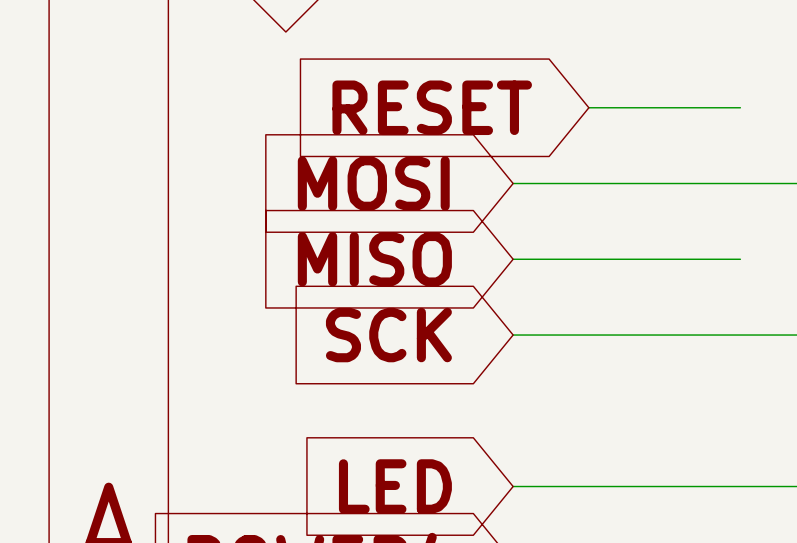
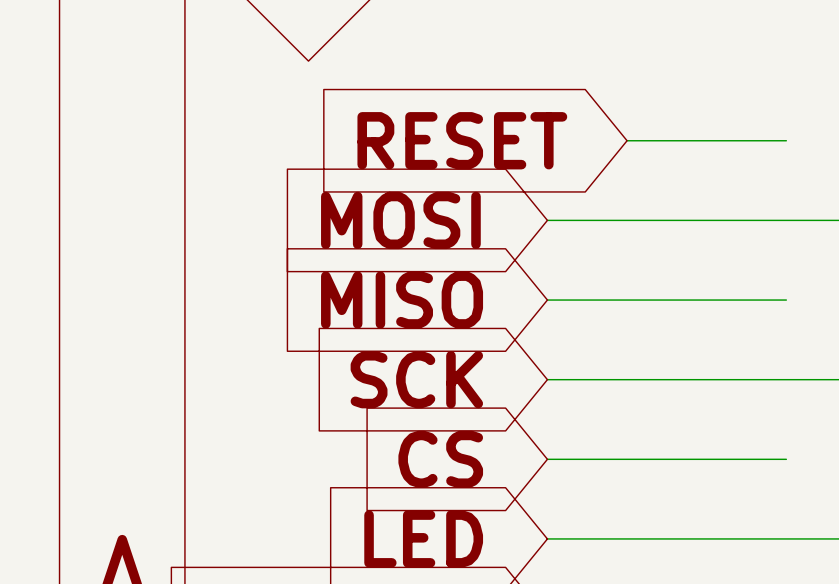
global label: none -> CS (440, 459)
wire: none -> (547, 459) (786, 459)

